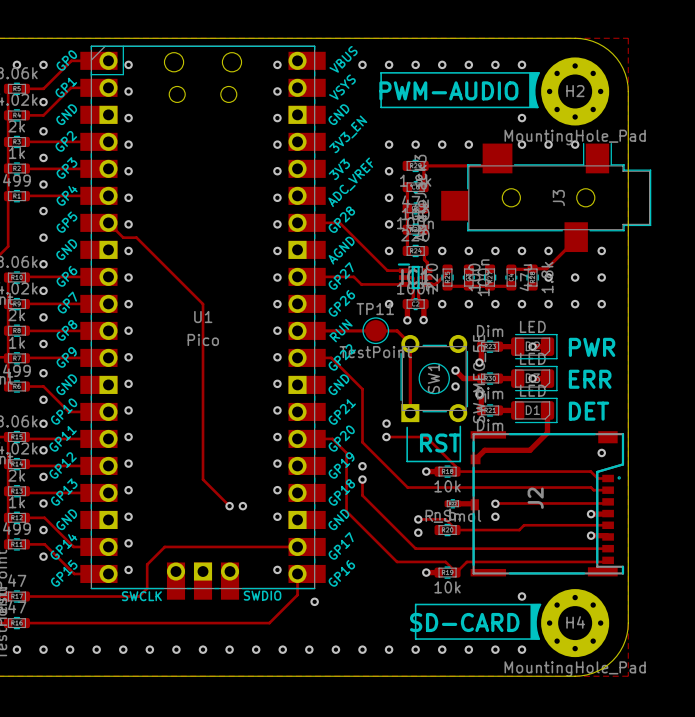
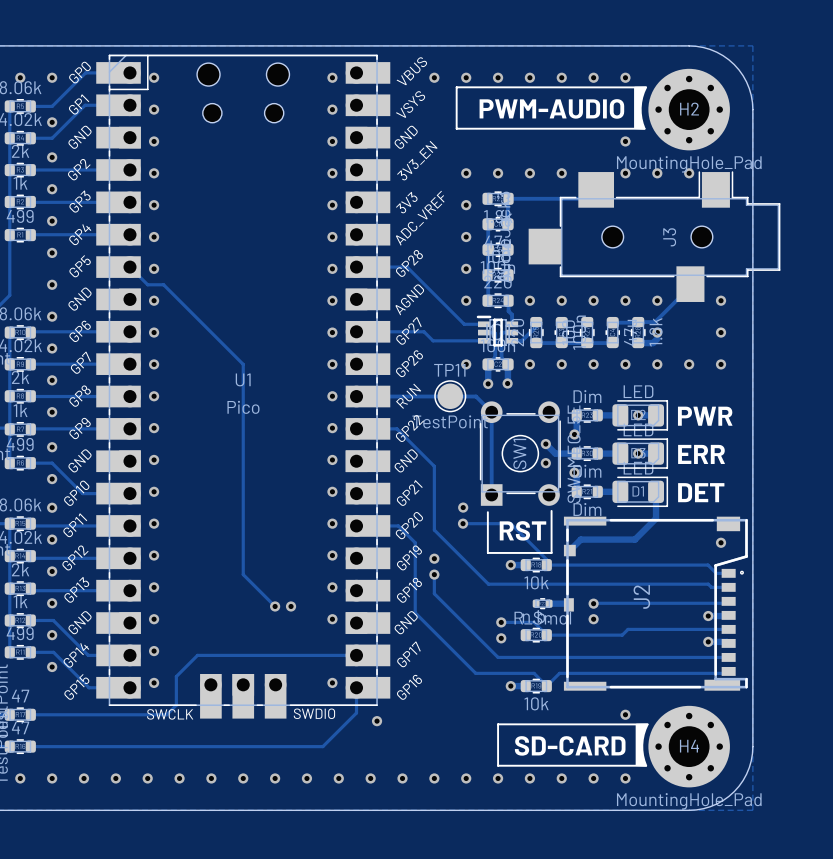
via: (575, 277) -> none
track: none -> (657, 338) (653, 343) (638, 343)

